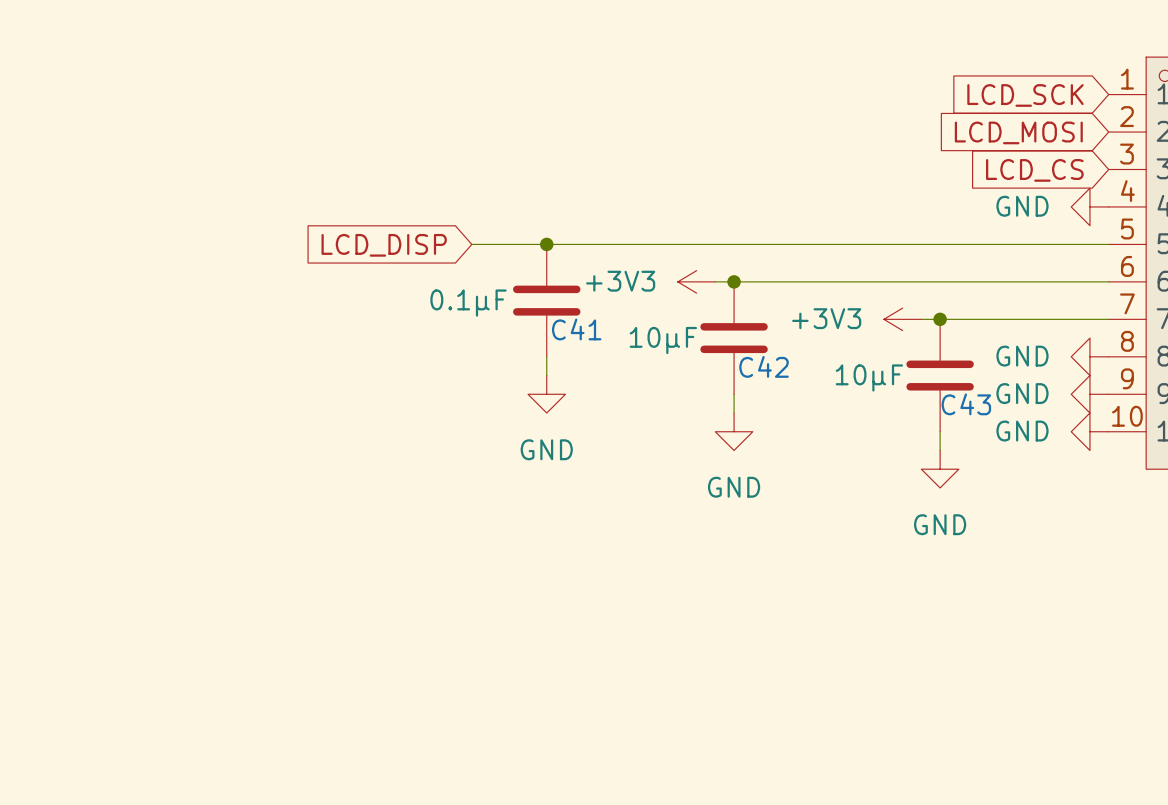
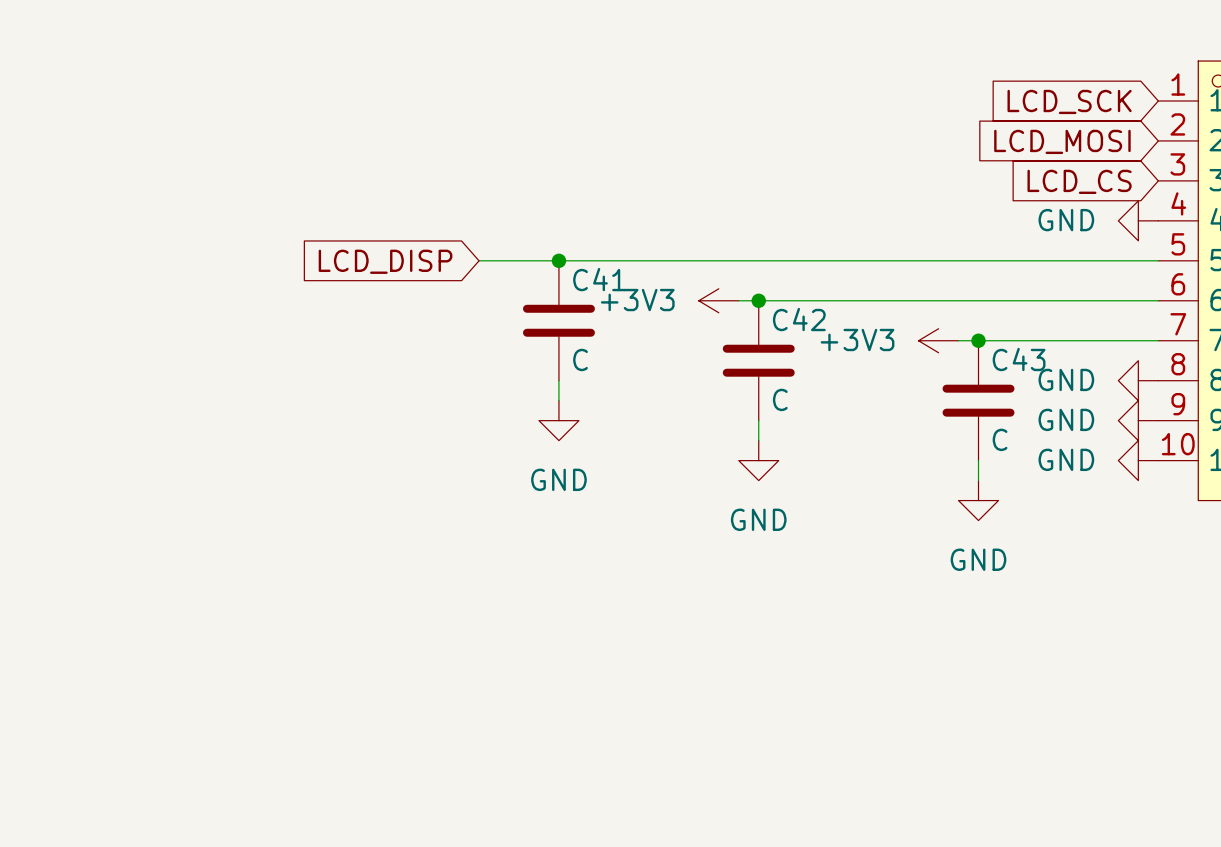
C41 value: 0.1µF (468, 303) -> C (580, 359)
C41 name position: C41 (576, 329) -> C41 (599, 279)
C42 value: 10µF (663, 340) -> C (780, 399)
C42 name position: C42 (764, 366) -> C42 (799, 319)
C43 value: 10µF (869, 377) -> C (1000, 439)
C43 name position: C43 (966, 404) -> C43 (1019, 359)

